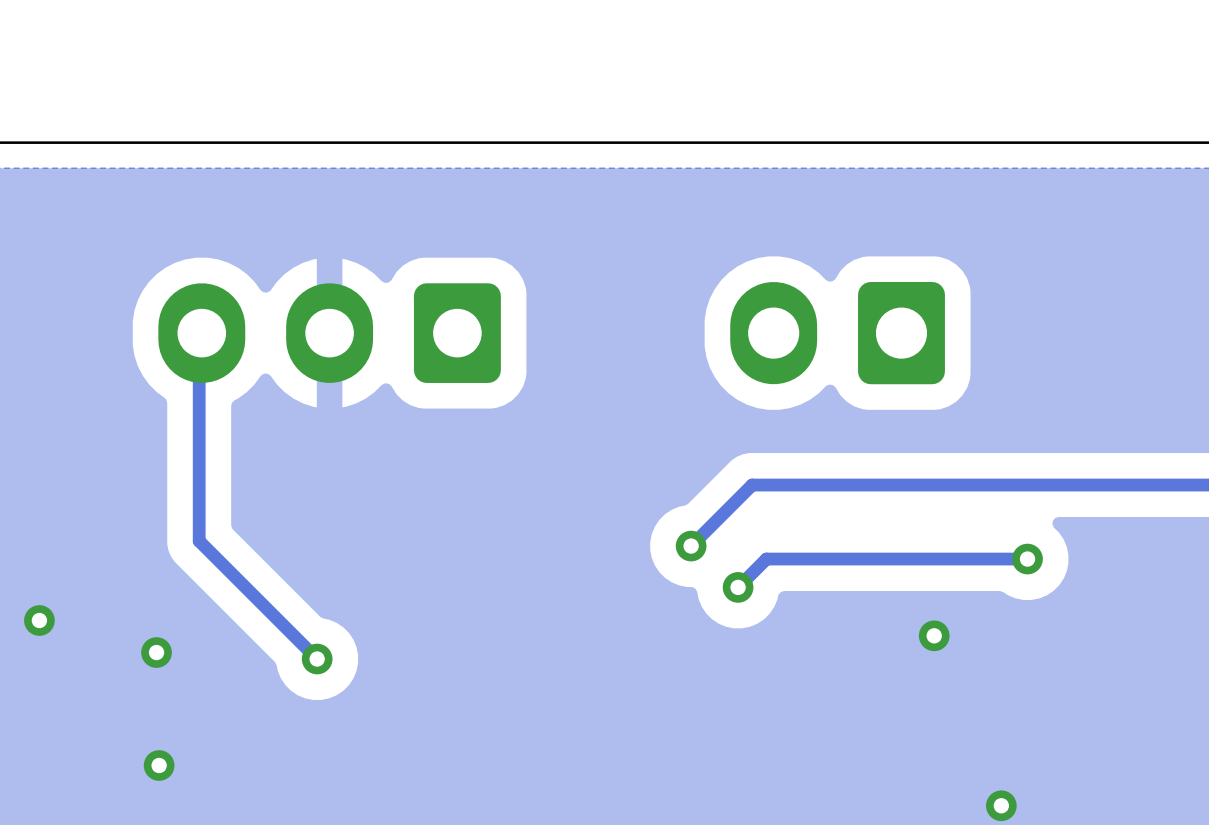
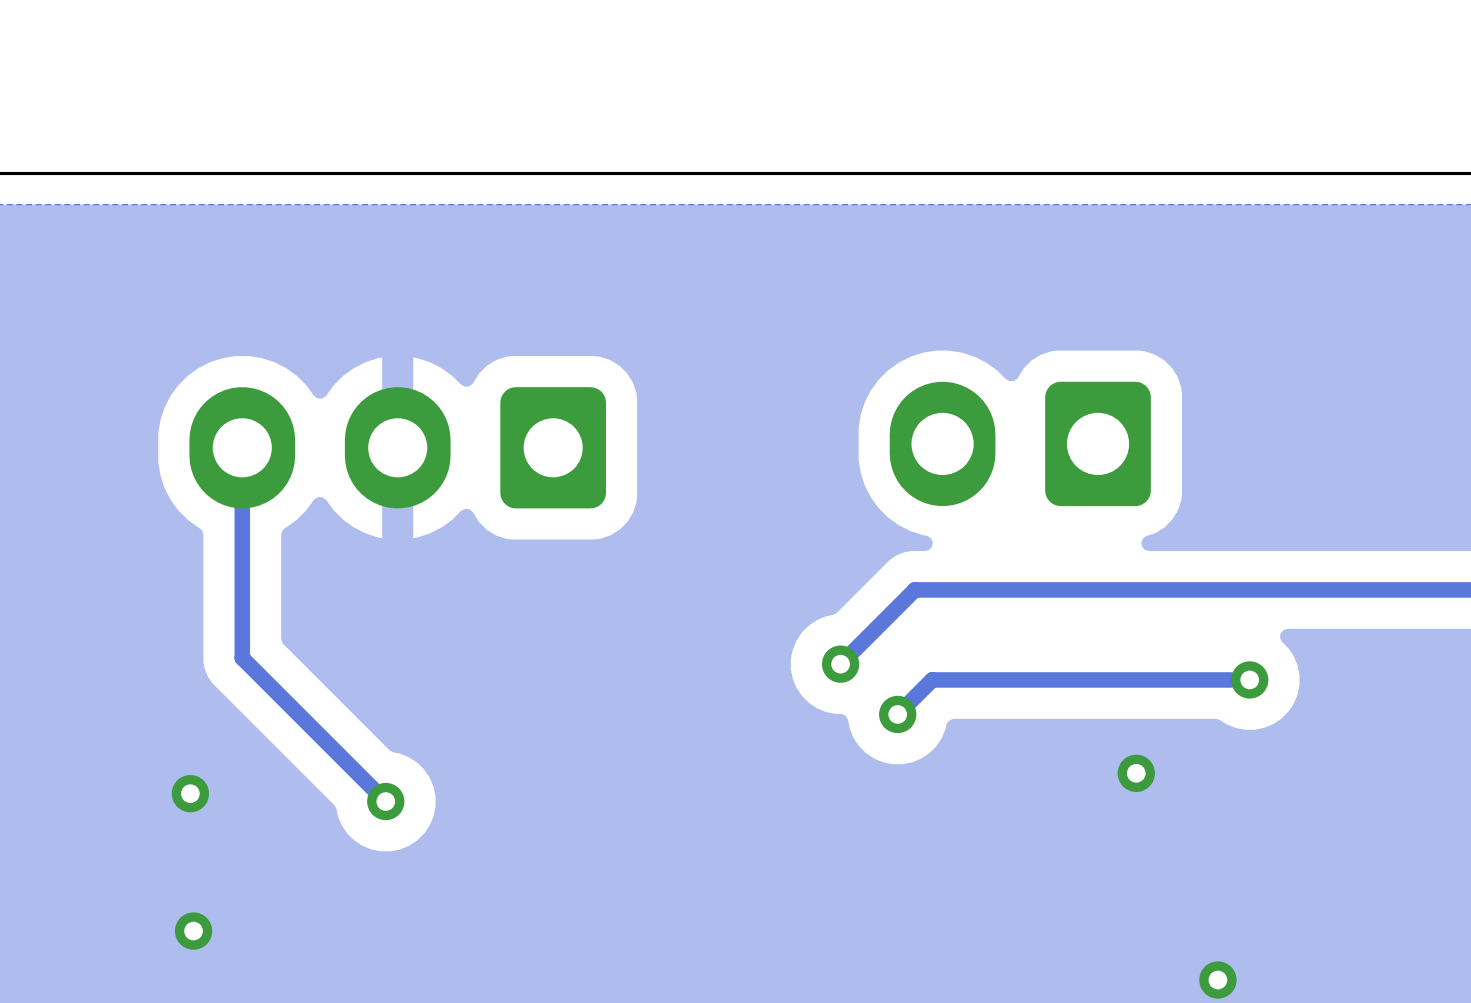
part position: (329, 333) -> (397, 447)
part position: (837, 333) -> (1020, 443)
via: (39, 620) -> none

